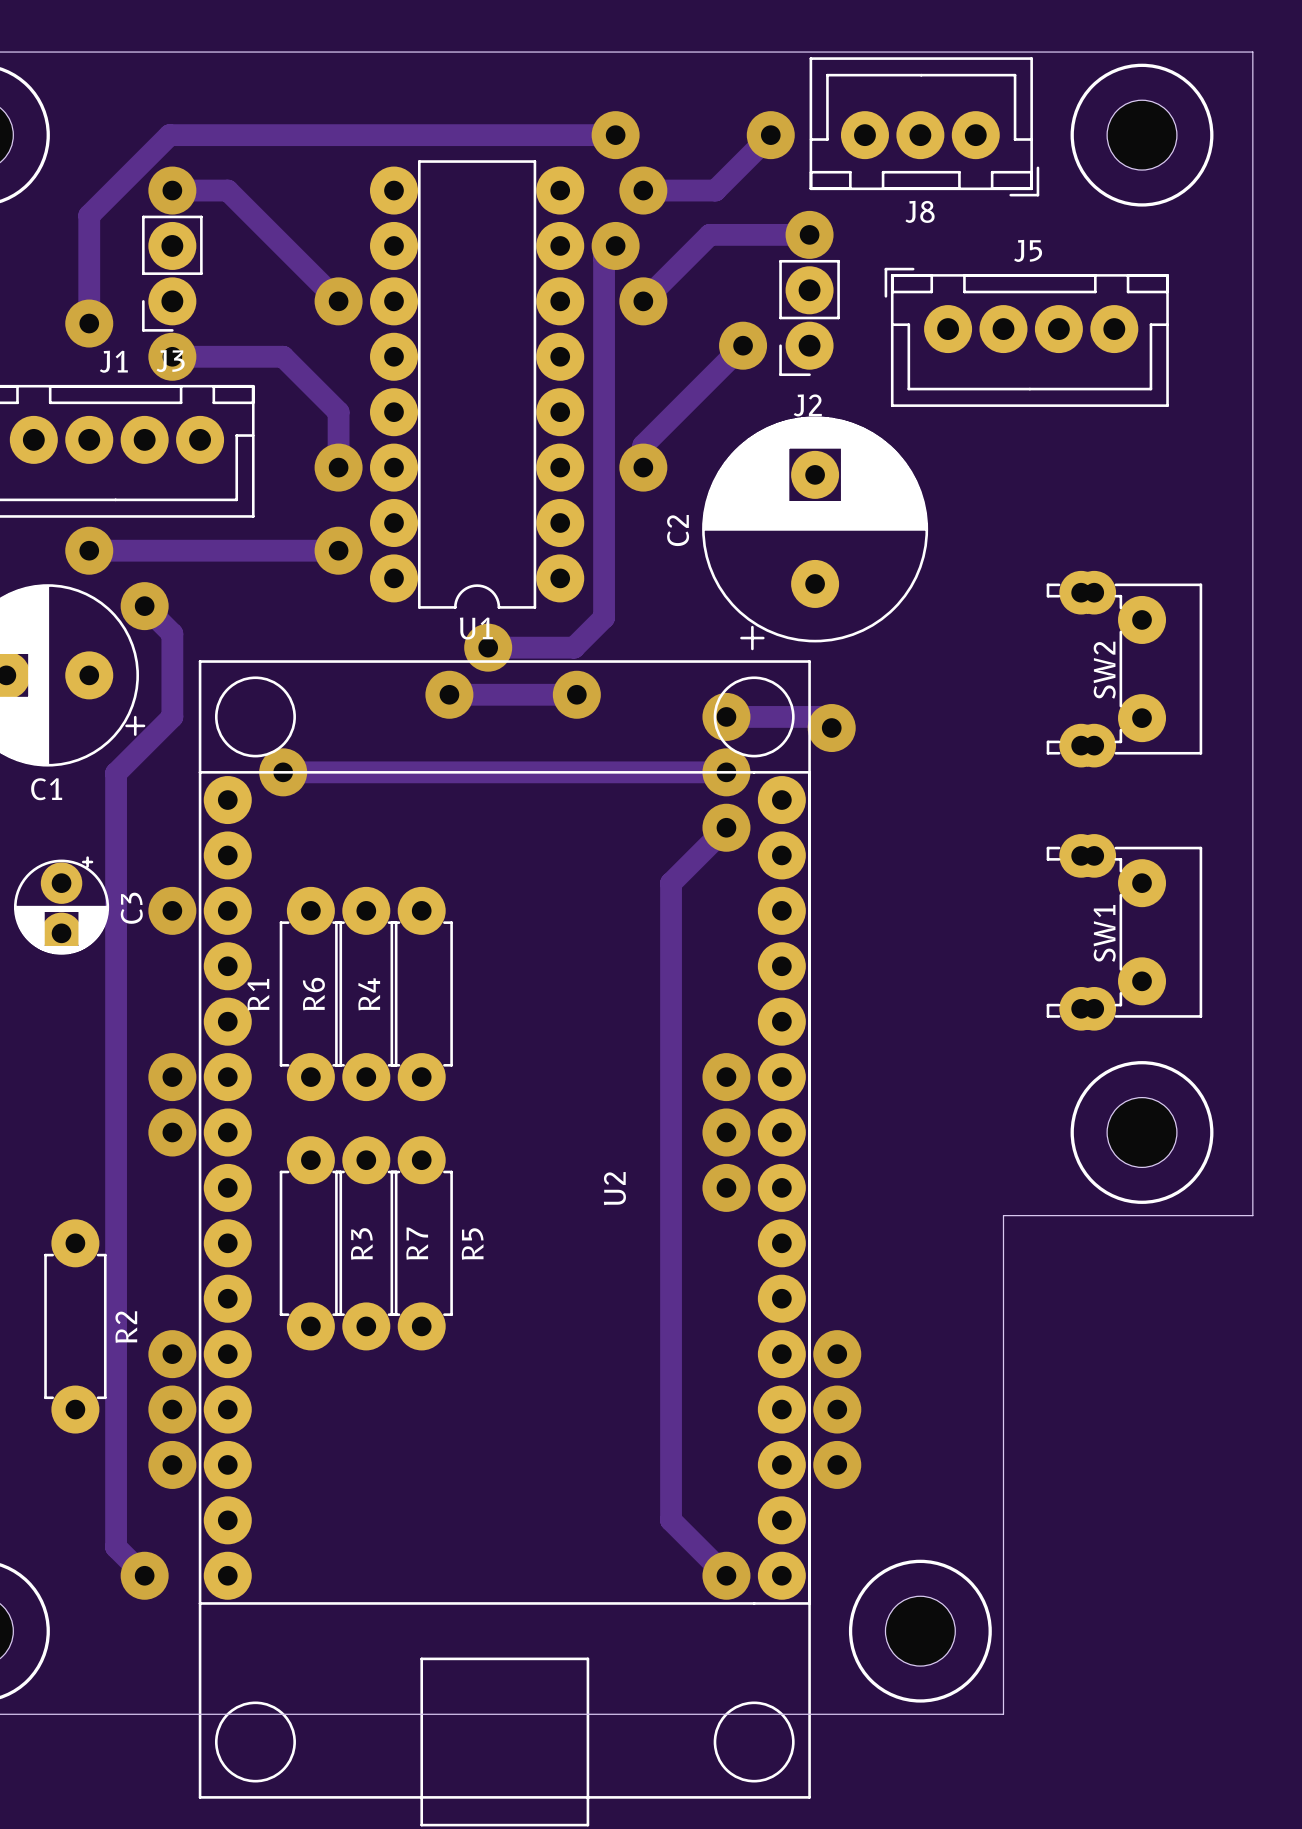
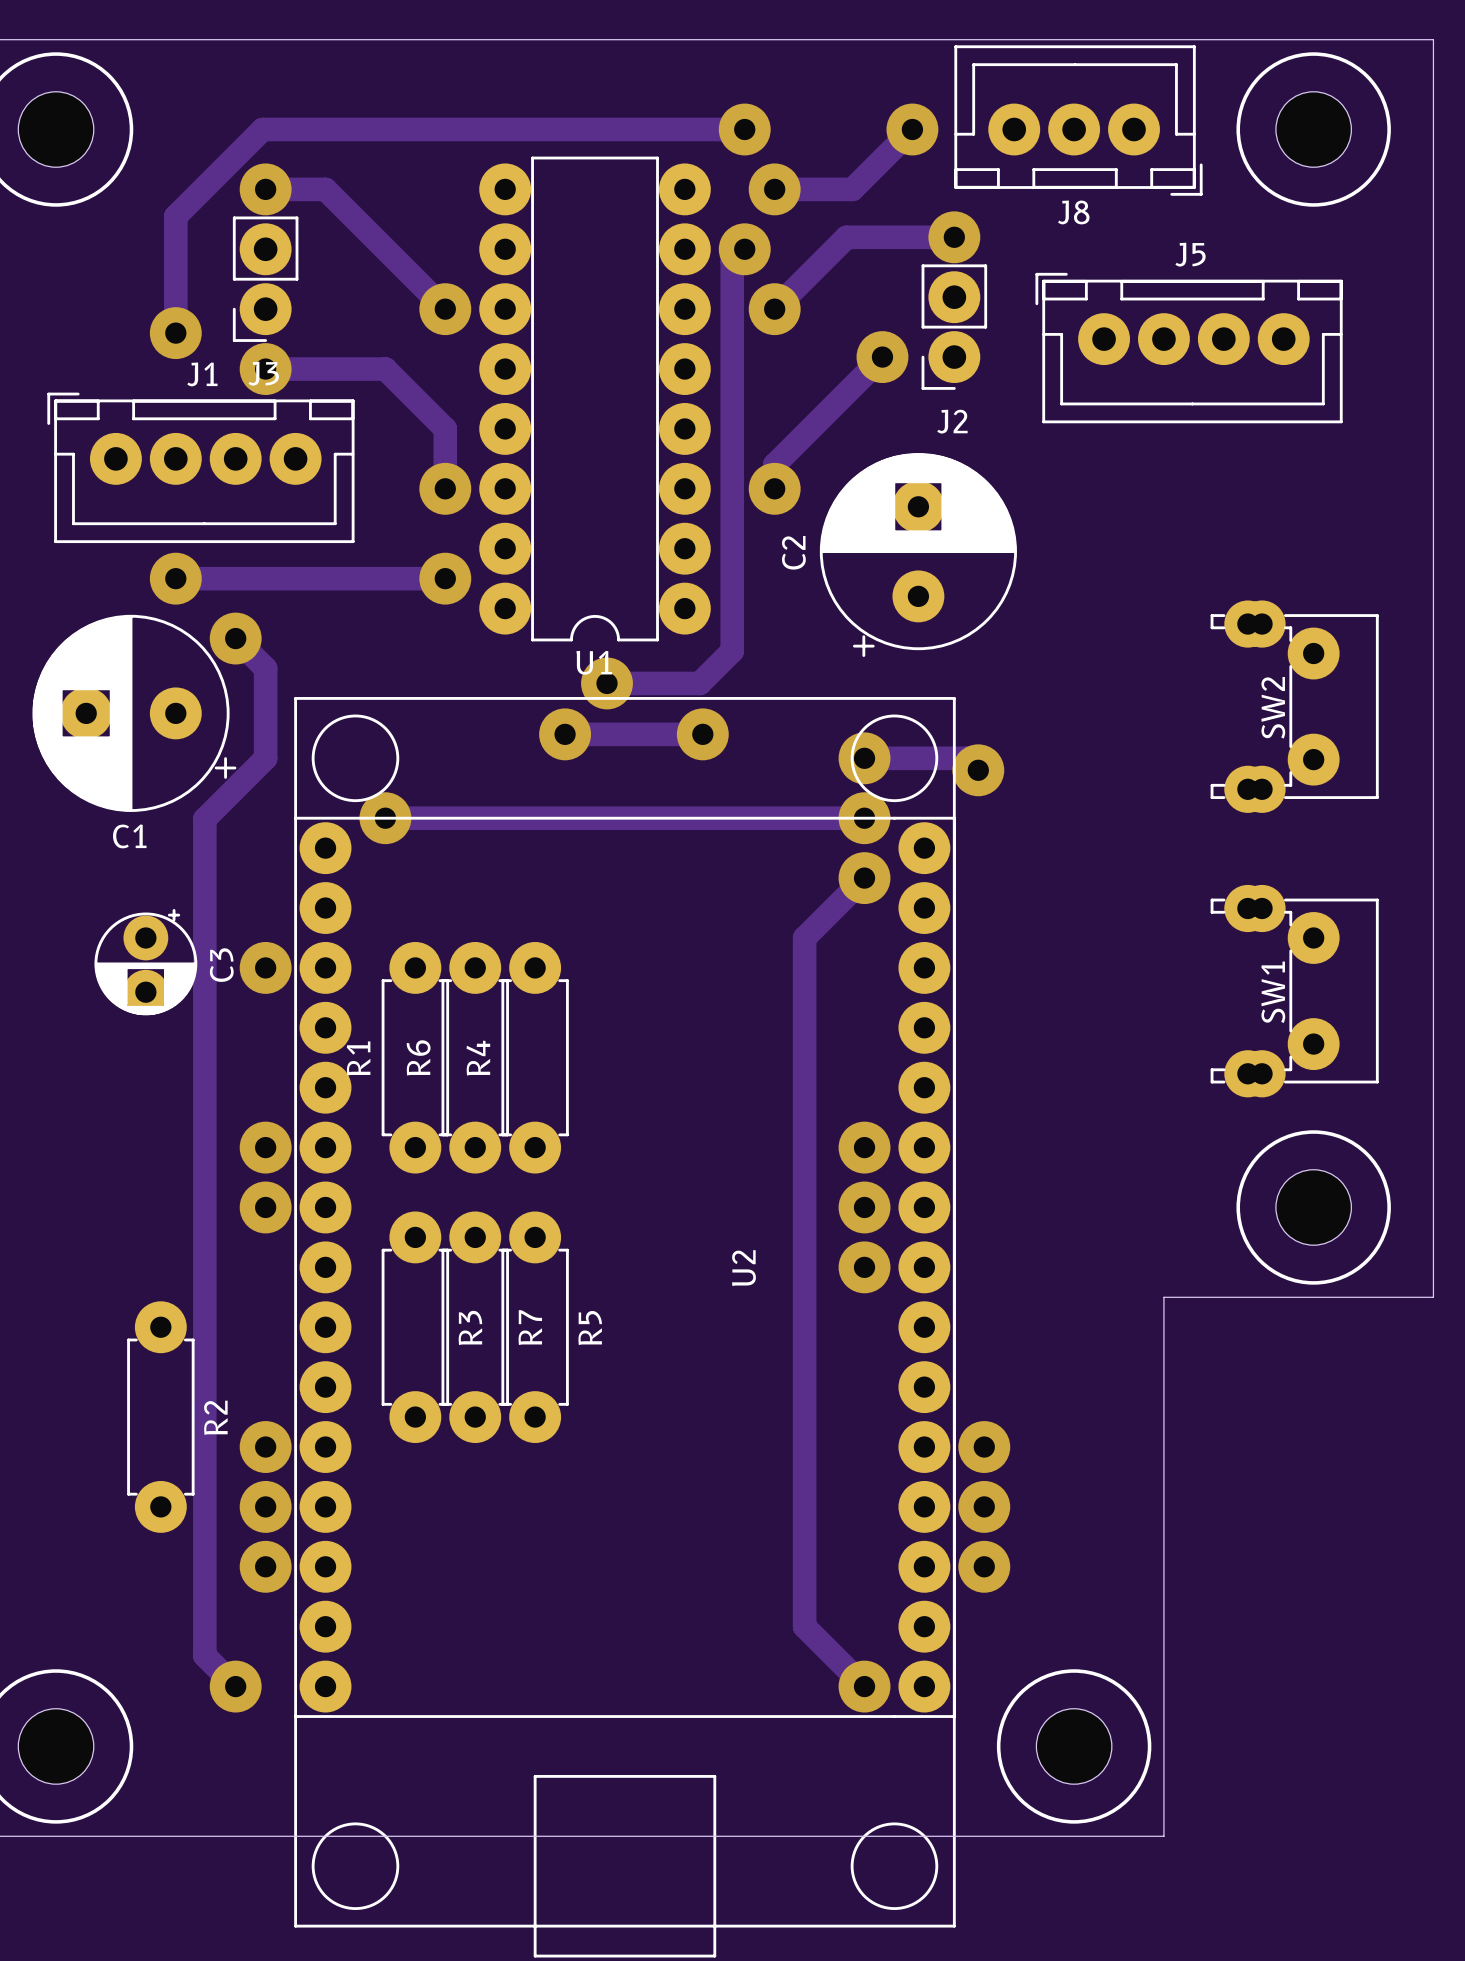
C2 footprint: [702, 416, 929, 651] -> [819, 453, 1017, 657]

